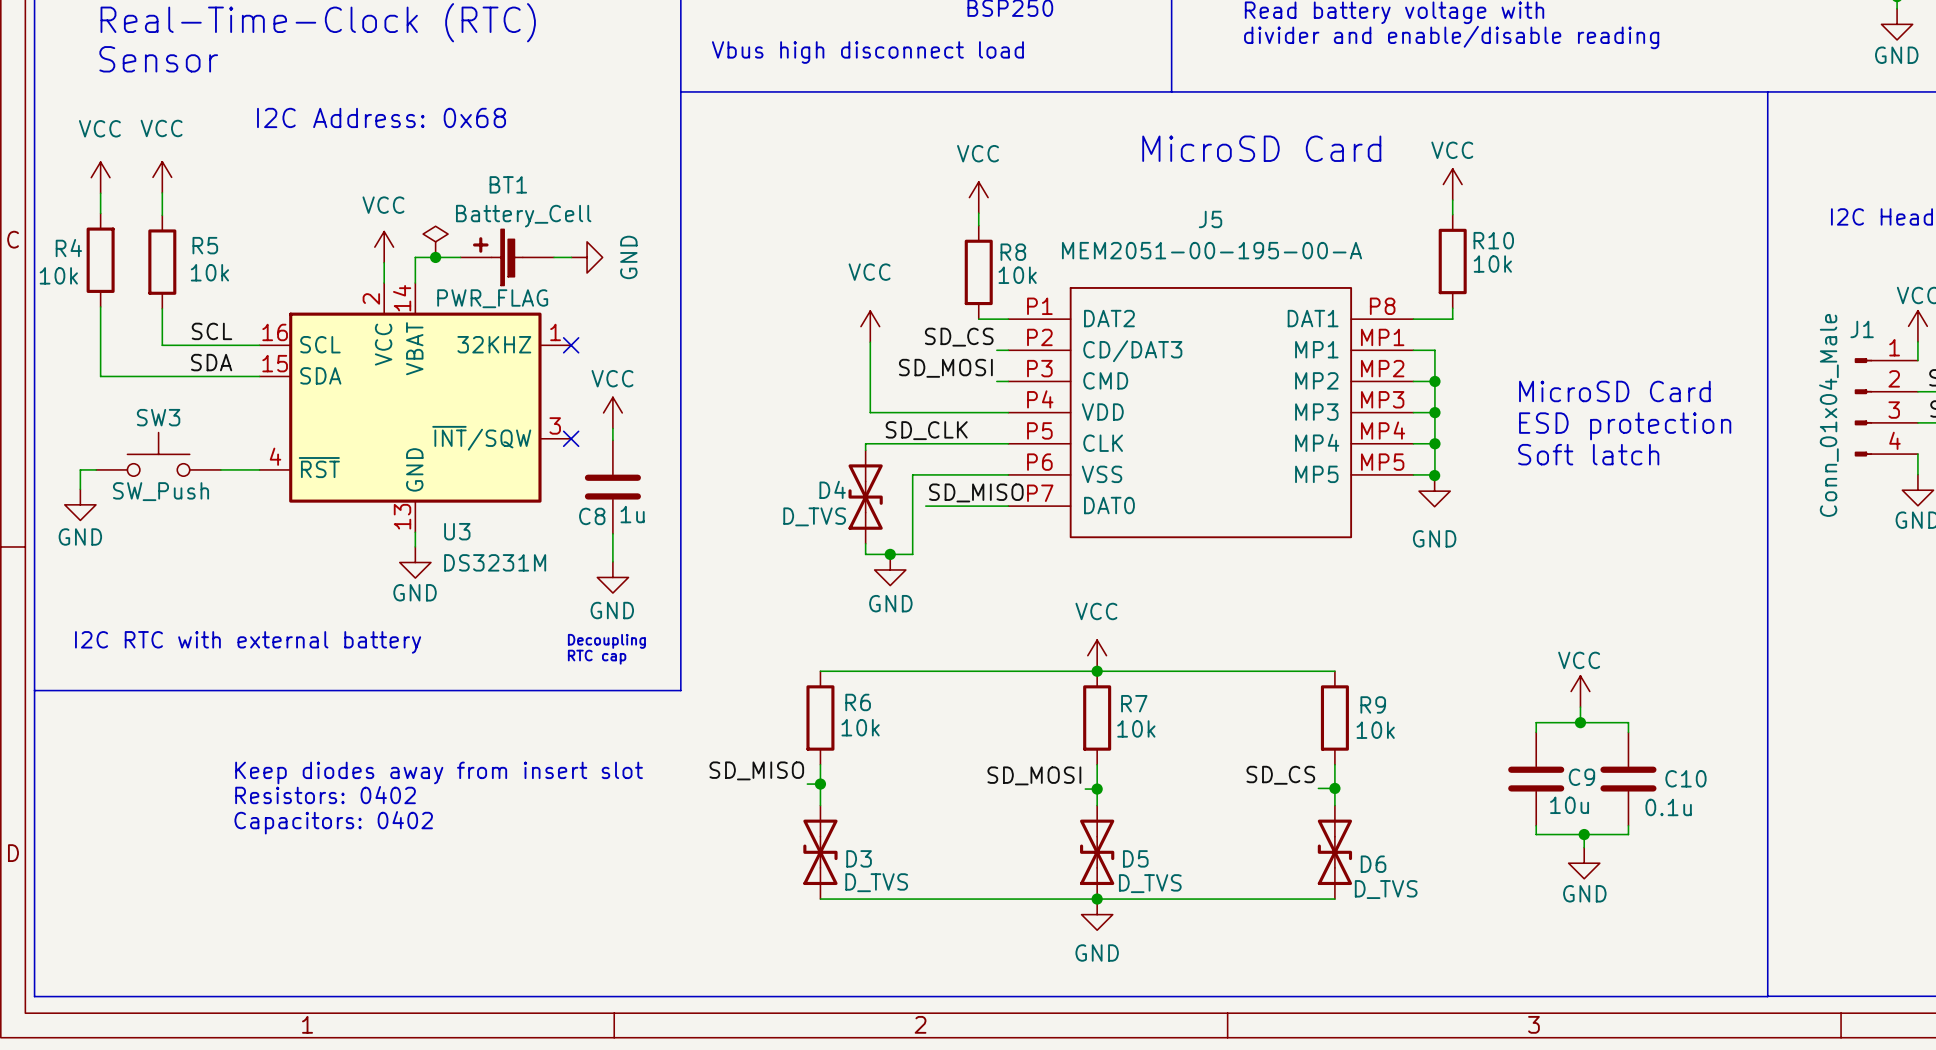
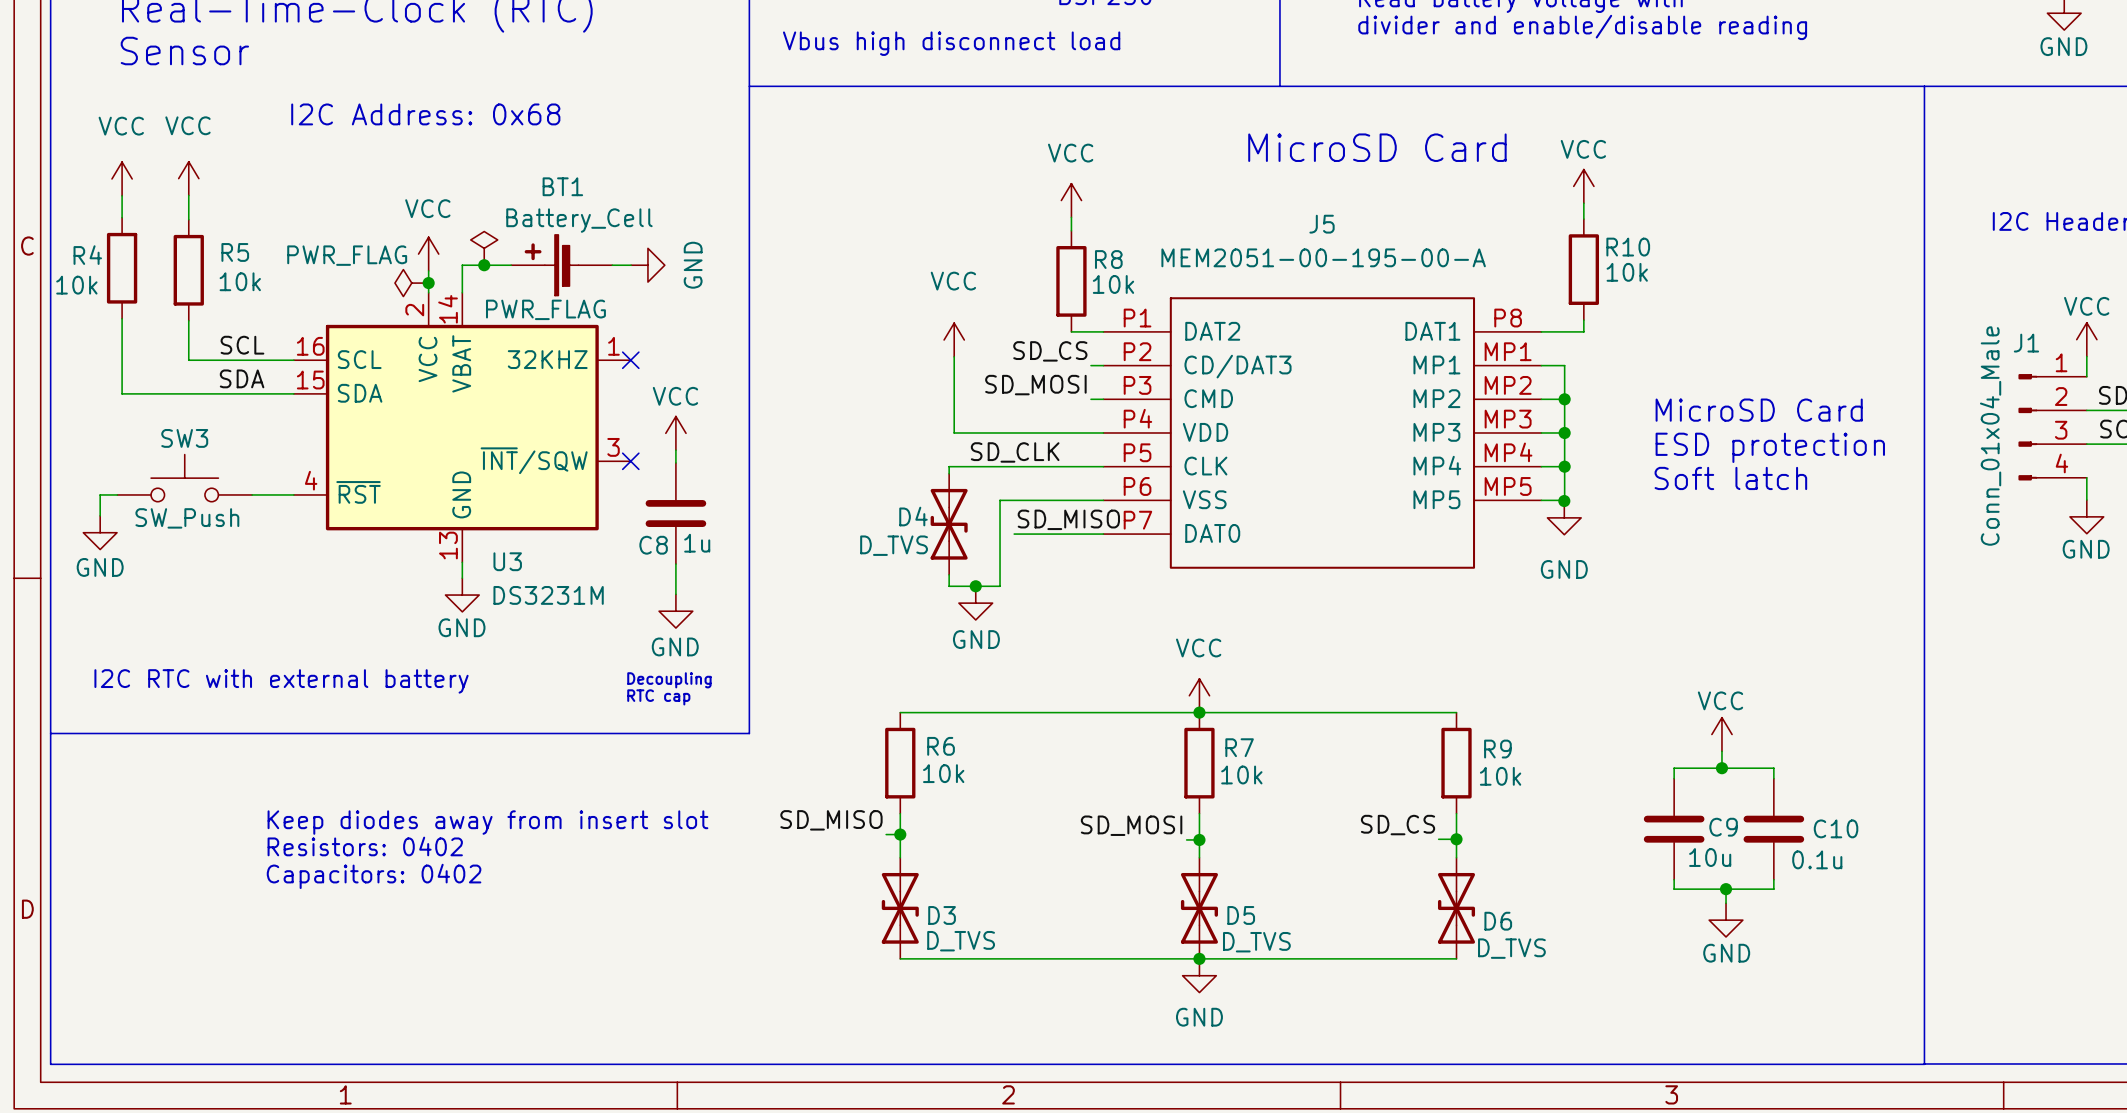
power symbol: none -> PWR_FLAG (411, 283)
junction: none -> (428, 283)

